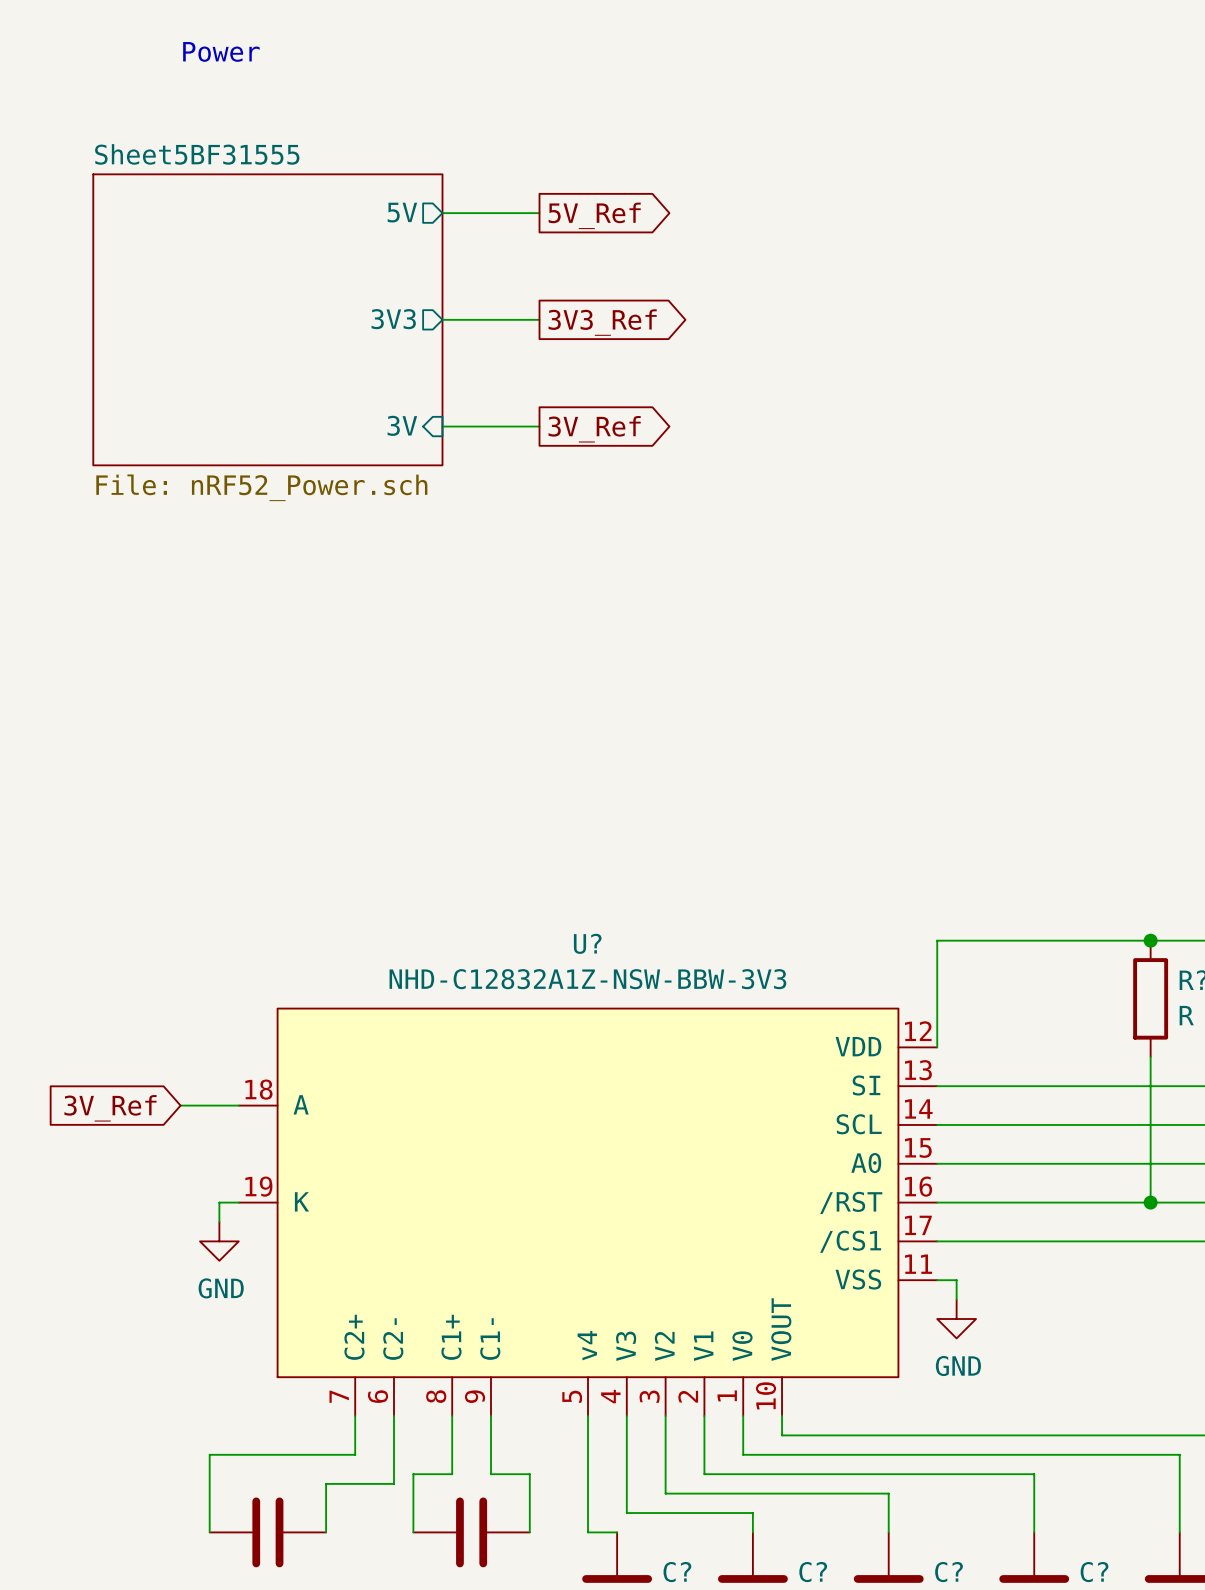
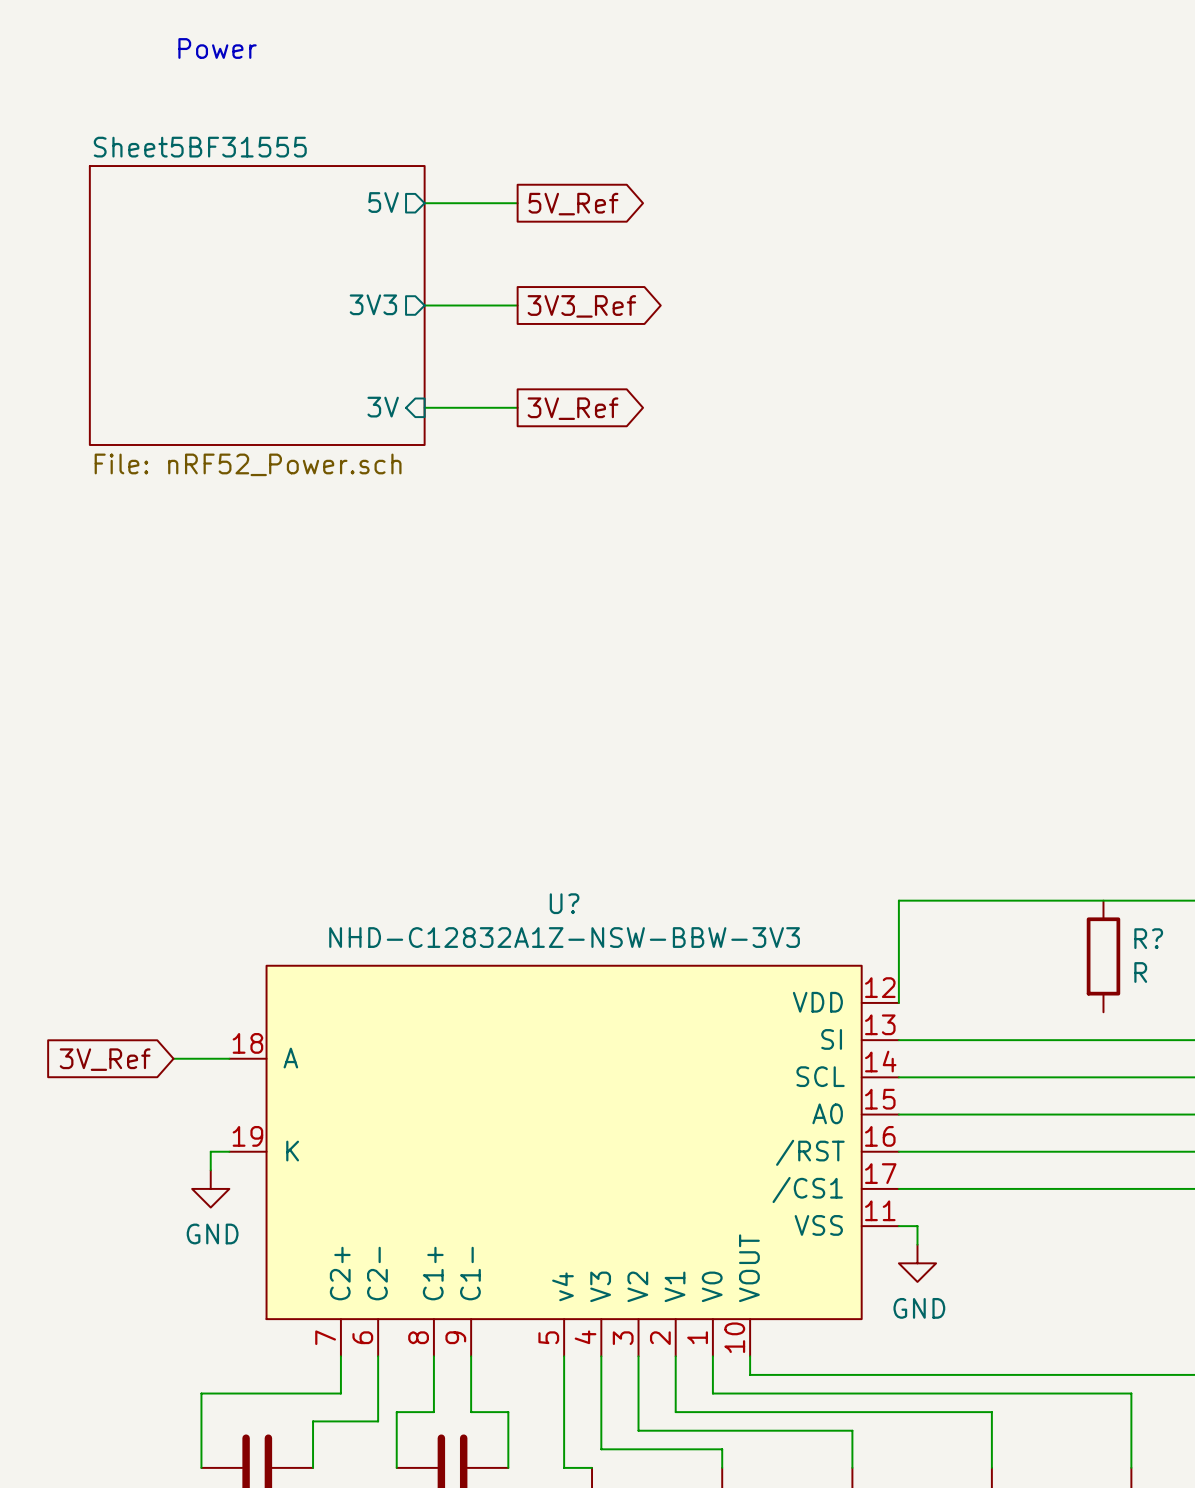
junction: (1150, 940) -> none
wire: (1150, 1057) (1150, 1202) -> none
junction: (1150, 1202) -> none

